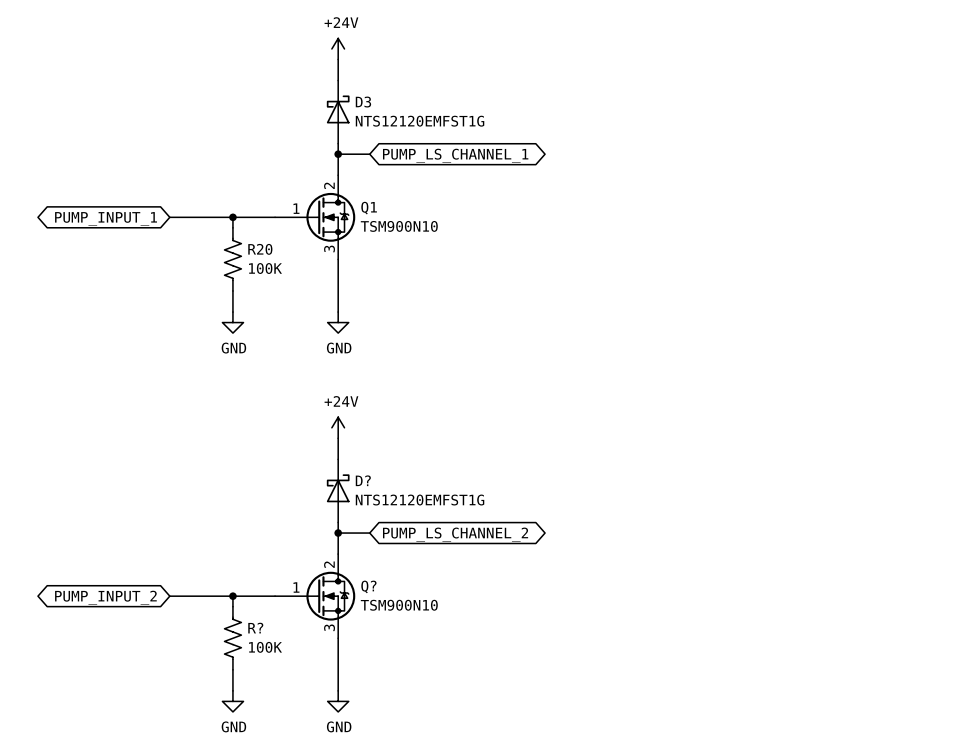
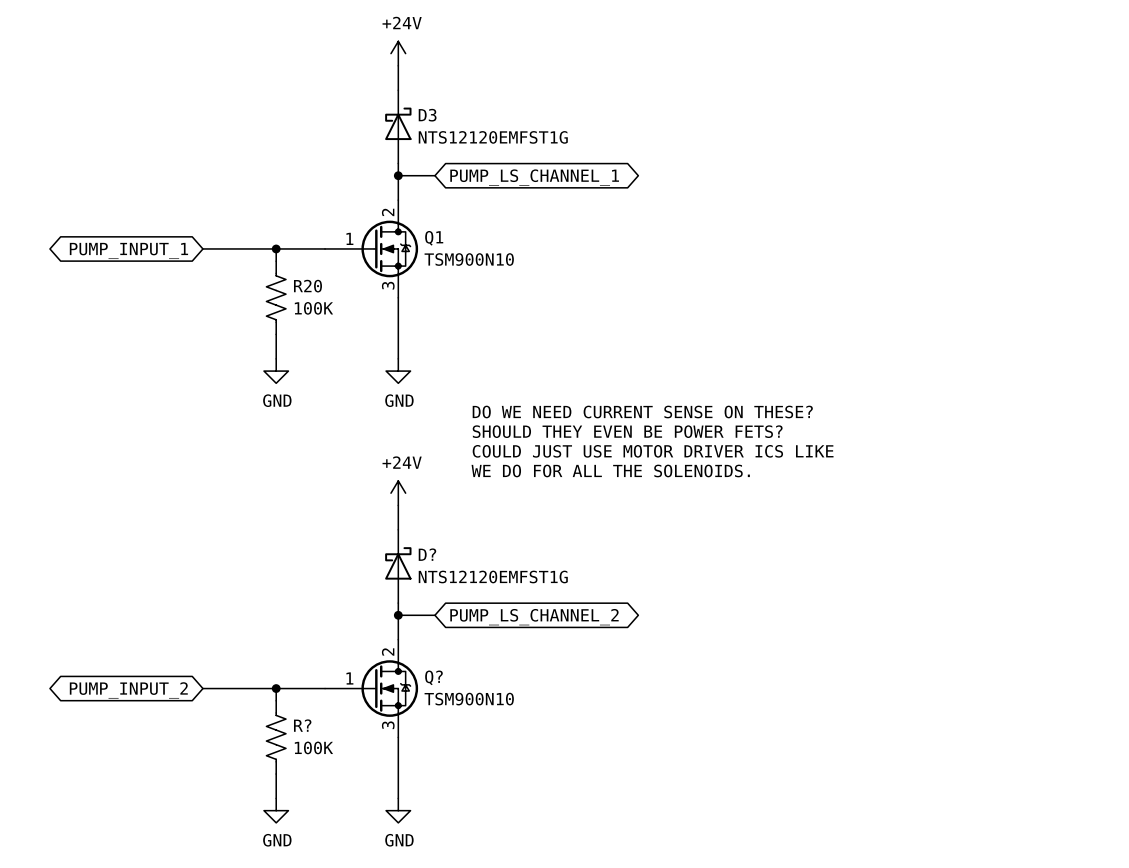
text: none -> DO WE NEED CURRENT SENSE ON THESE? (642, 412)
text: none -> SHOULD THEY EVEN BE POWER FETS? (627, 431)
text: none -> COULD JUST USE MOTOR DRIVER ICS LIKE (653, 451)
text: none -> WE DO FOR ALL THE SOLENOIDS. (610, 470)

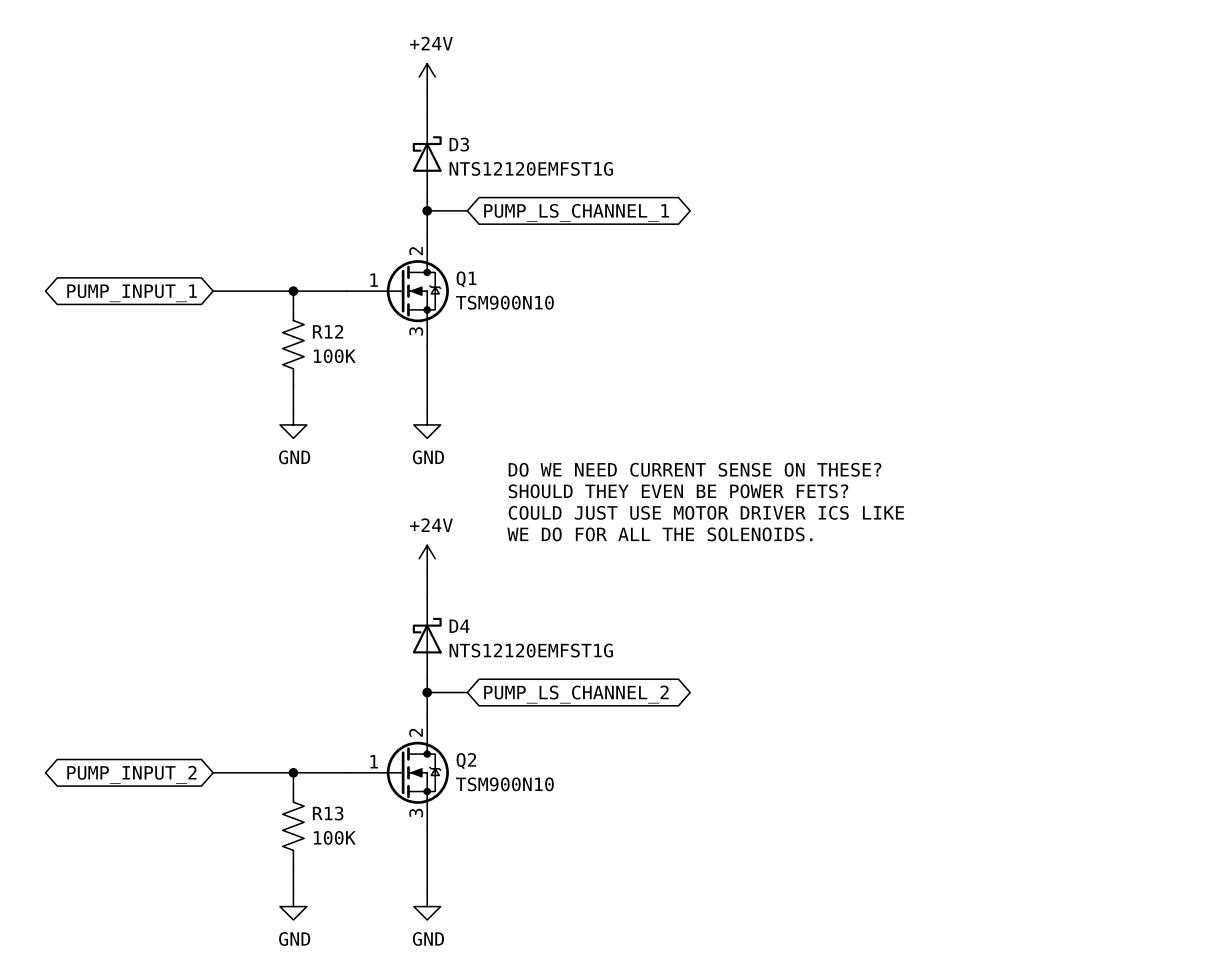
R20 name: R20 (307, 286) -> R12 (328, 331)
D? name: D? (427, 554) -> D4 (459, 626)
Q? name: Q? (433, 677) -> Q2 (466, 761)
R? name: R? (302, 725) -> R13 (328, 813)

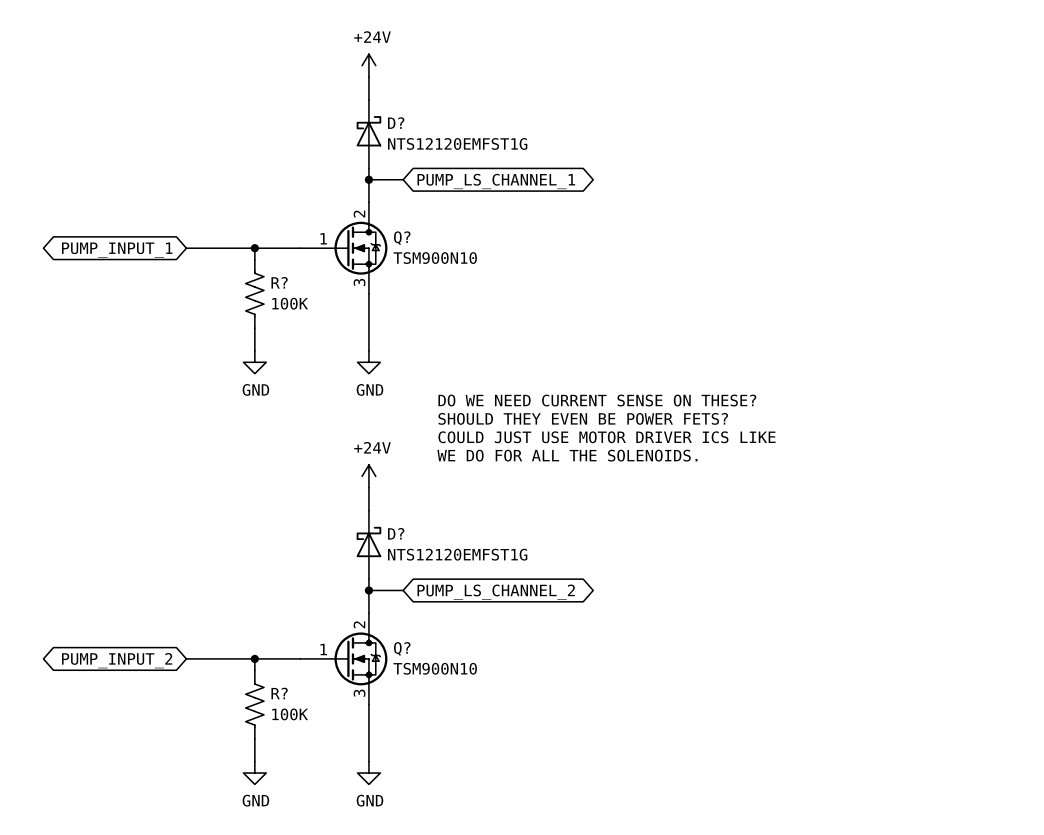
D3 name: D3 (459, 144) -> D? (396, 123)
Q1 name: Q1 (466, 279) -> Q? (402, 238)
R12 name: R12 (328, 331) -> R? (279, 282)
D4 name: D4 (459, 626) -> D? (396, 533)
Q2 name: Q2 (466, 761) -> Q? (402, 648)
R13 name: R13 (328, 813) -> R? (279, 693)

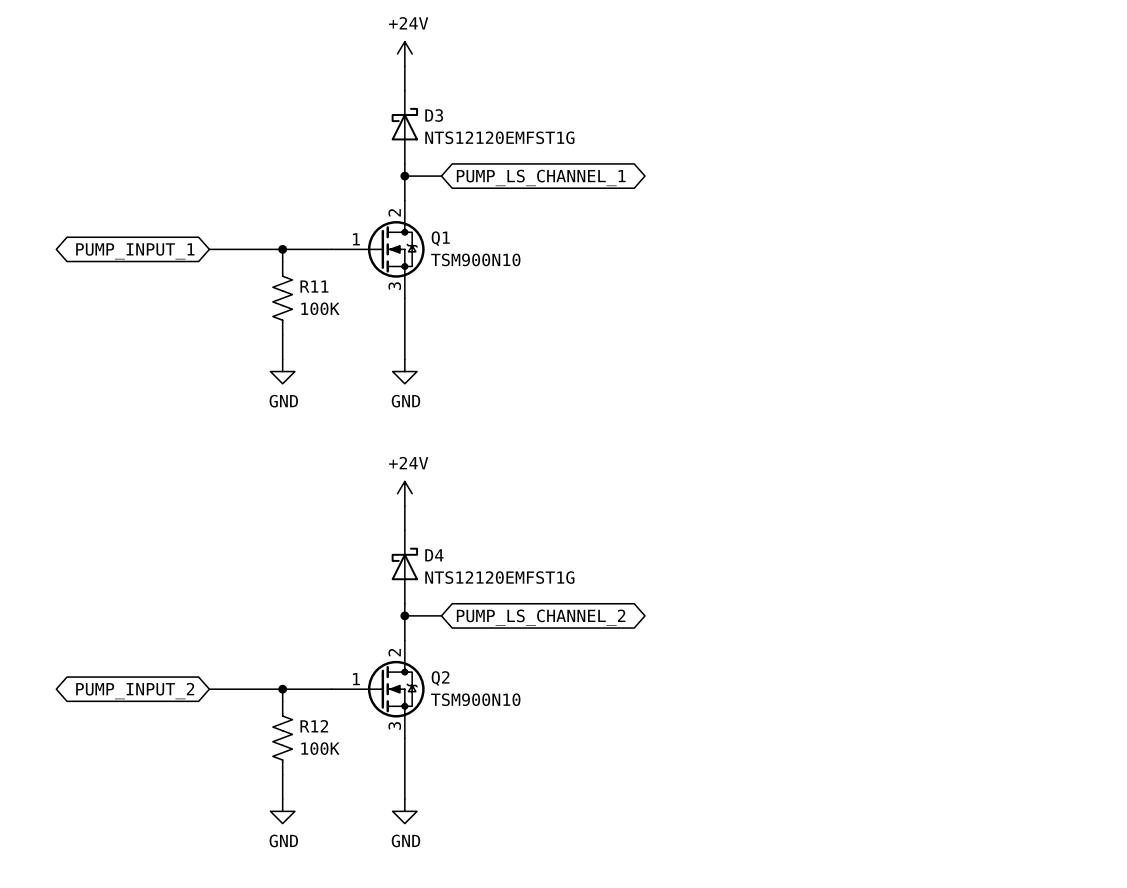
D? name: D? (396, 123) -> D3 (434, 115)
Q? name: Q? (402, 238) -> Q1 (440, 238)
R? name: R? (279, 282) -> R11 (314, 286)
text: DO WE NEED CURRENT SENSE ON THESE? (597, 400) -> none
text: SHOULD THEY EVEN BE POWER FETS? (583, 418) -> none
text: COULD JUST USE MOTOR DRIVER ICS LIKE (607, 437) -> none
text: WE DO FOR ALL THE SOLENOIDS. (567, 455) -> none
D? name: D? (396, 533) -> D4 (434, 555)
Q? name: Q? (402, 648) -> Q2 (440, 678)
R? name: R? (279, 693) -> R12 (314, 726)

